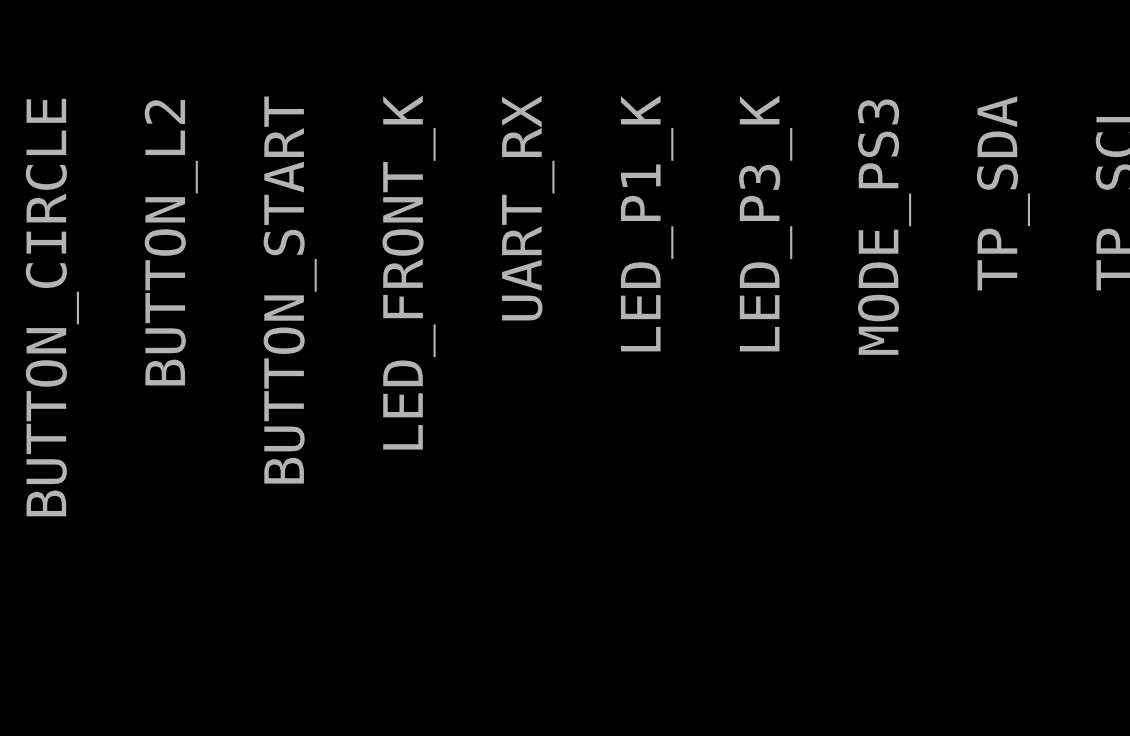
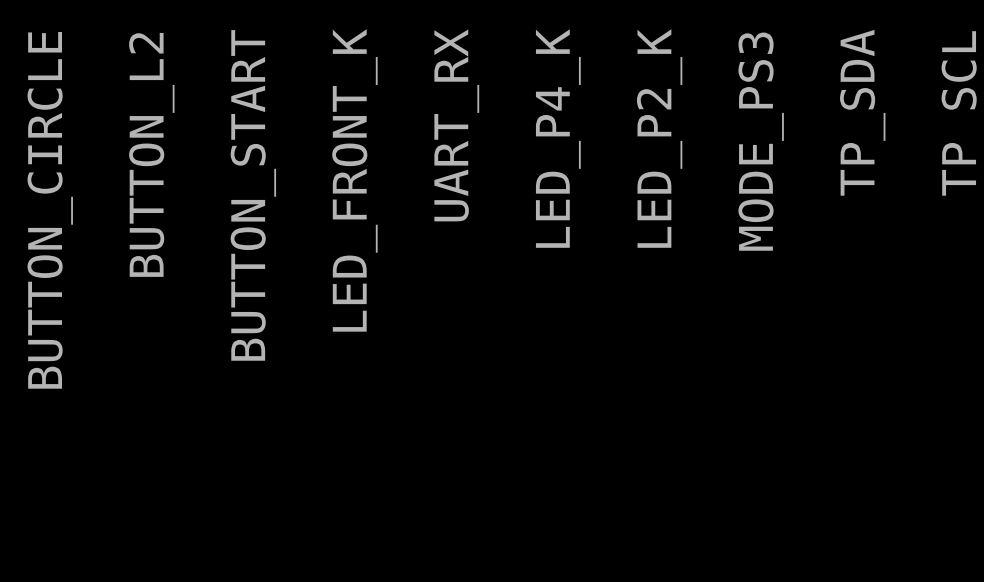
label: LED_P1_K (647, 223) -> LED_P4_K (558, 138)
label: LED_P3_K (765, 223) -> LED_P2_K (659, 138)

